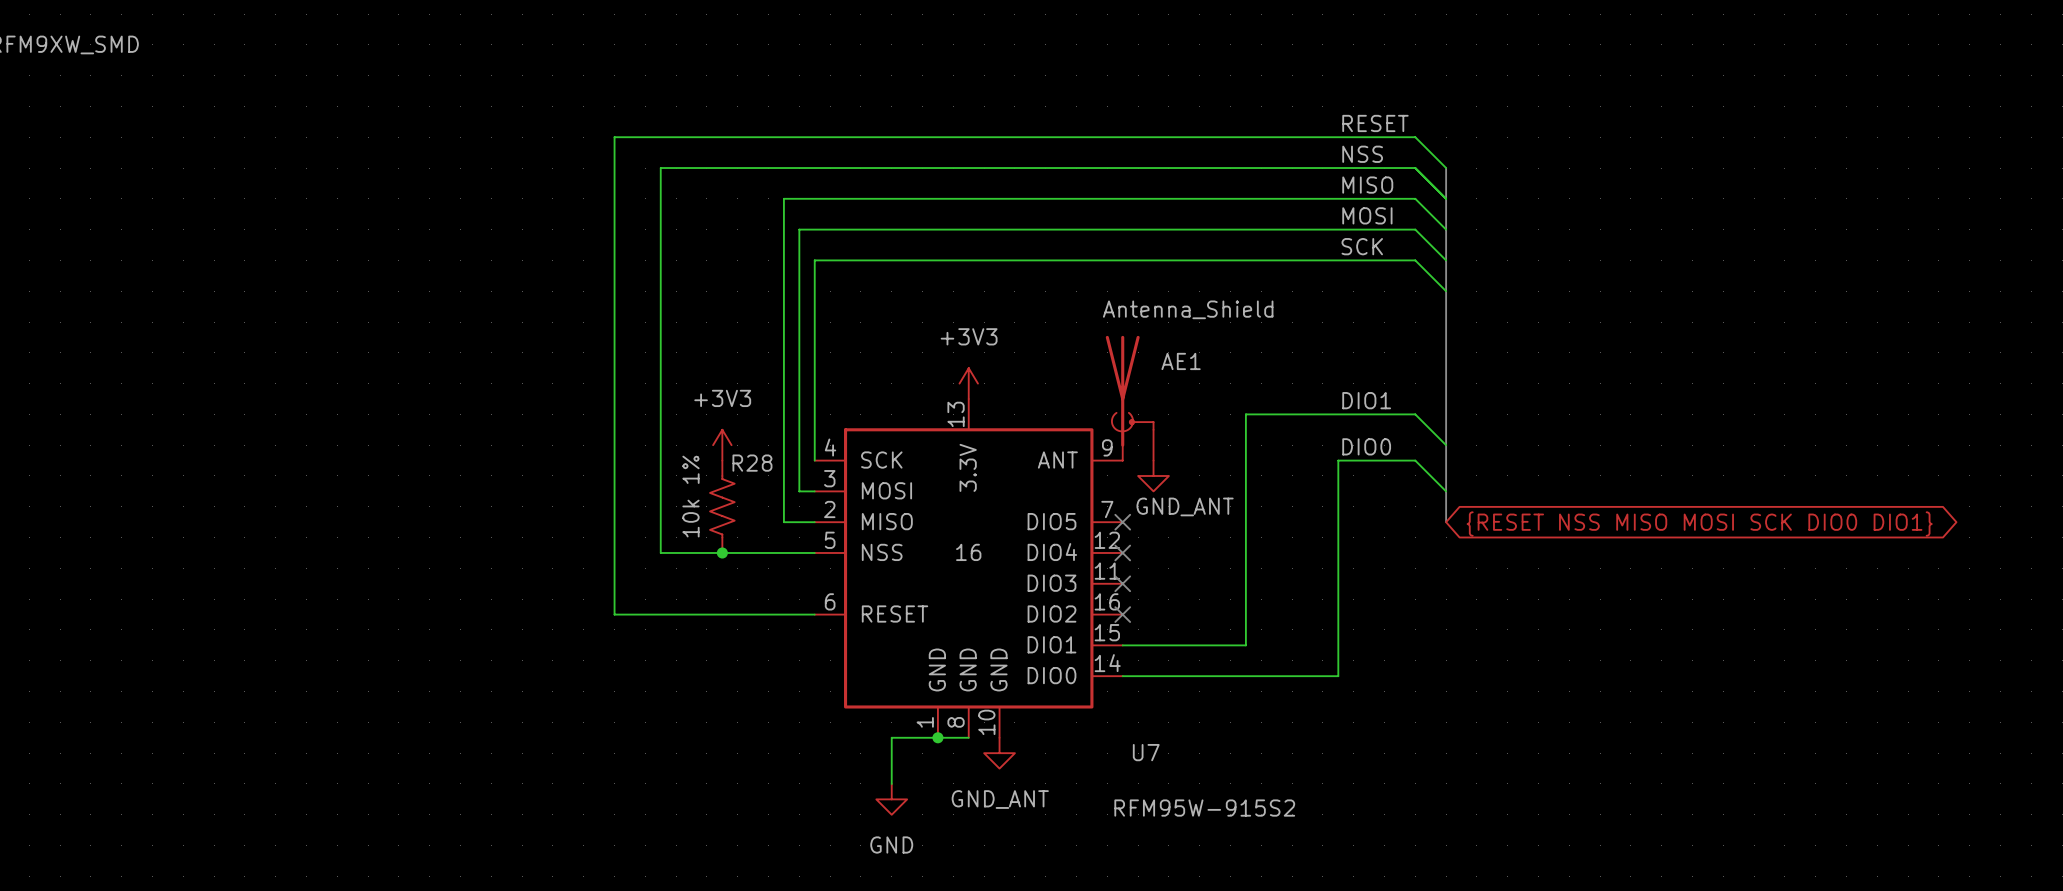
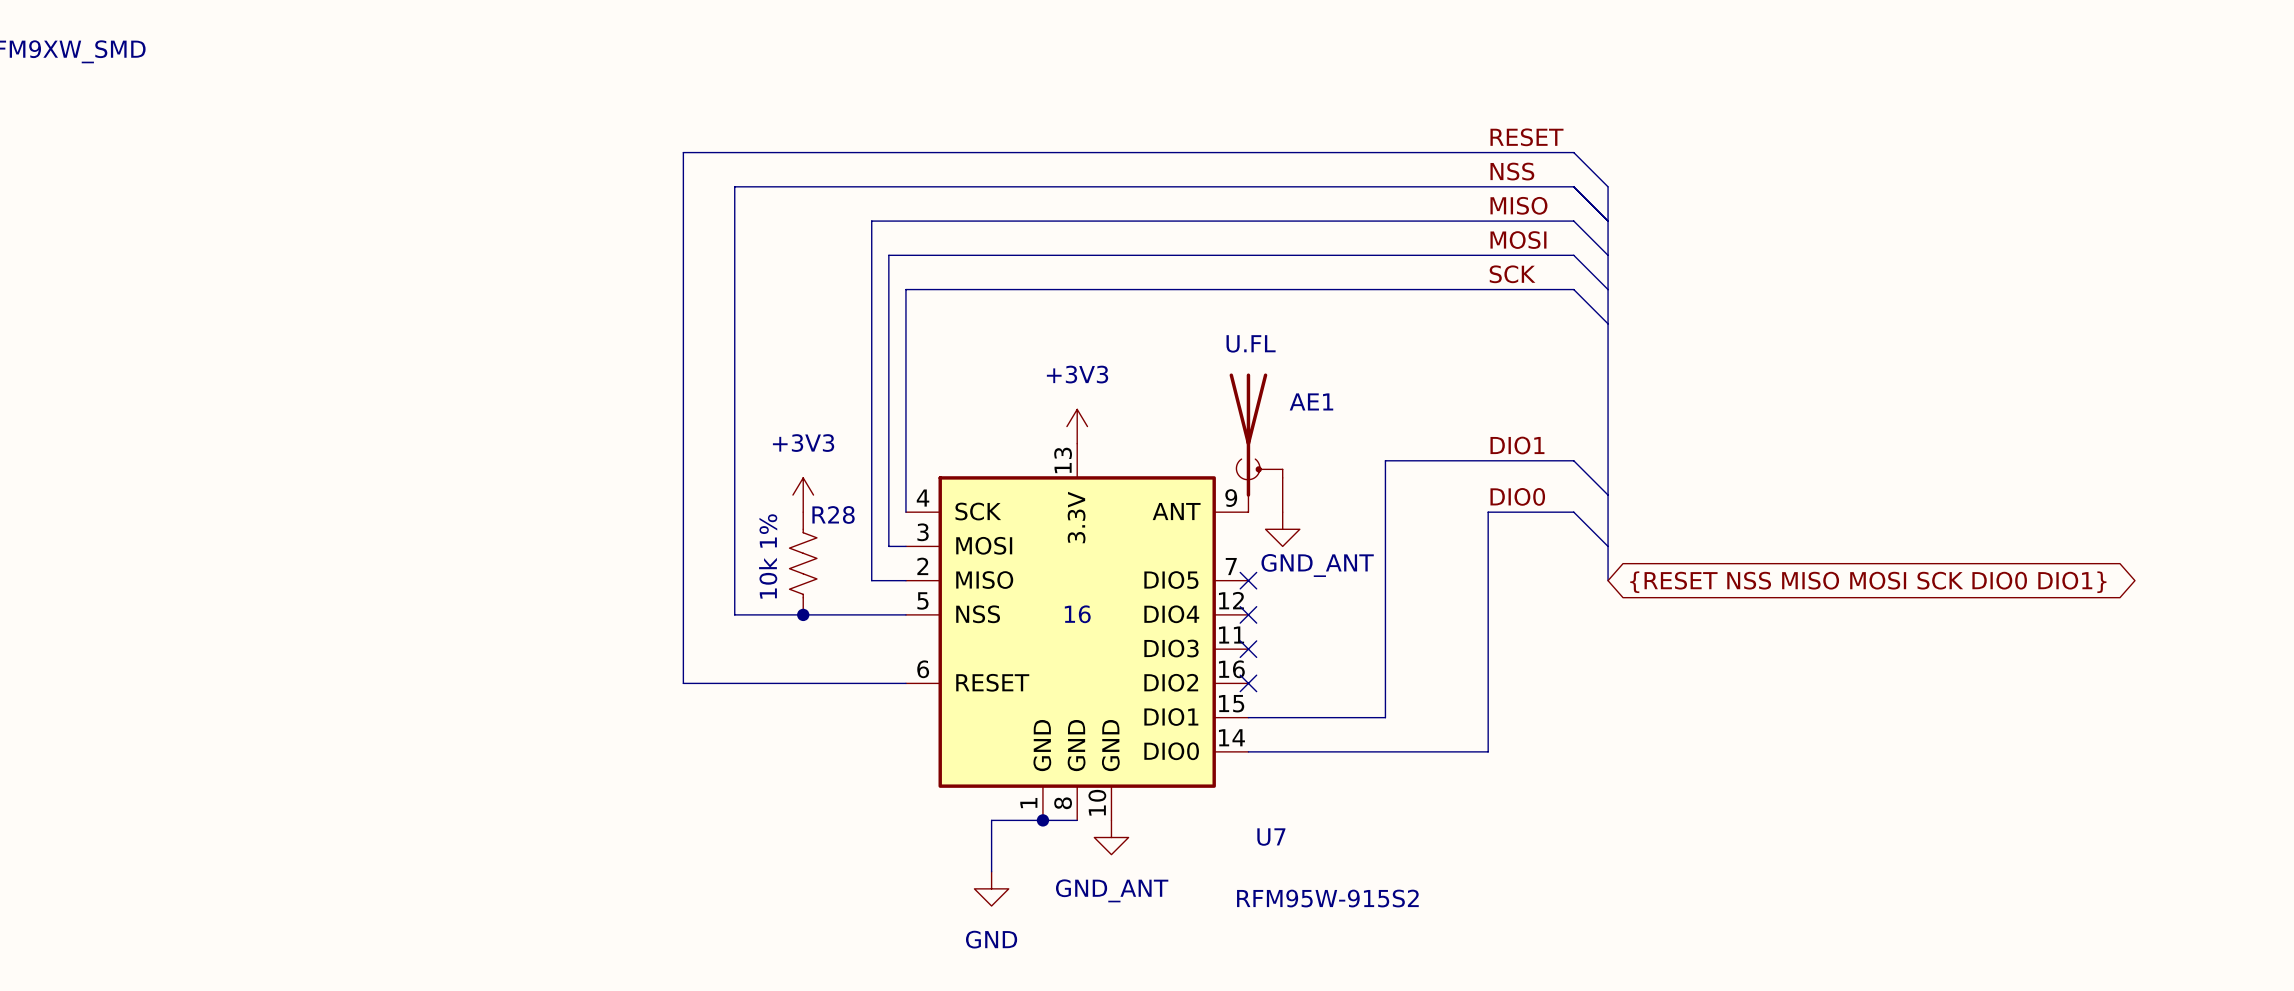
AE1 value: Antenna_Shield (1188, 309) -> U.FL (1251, 343)

